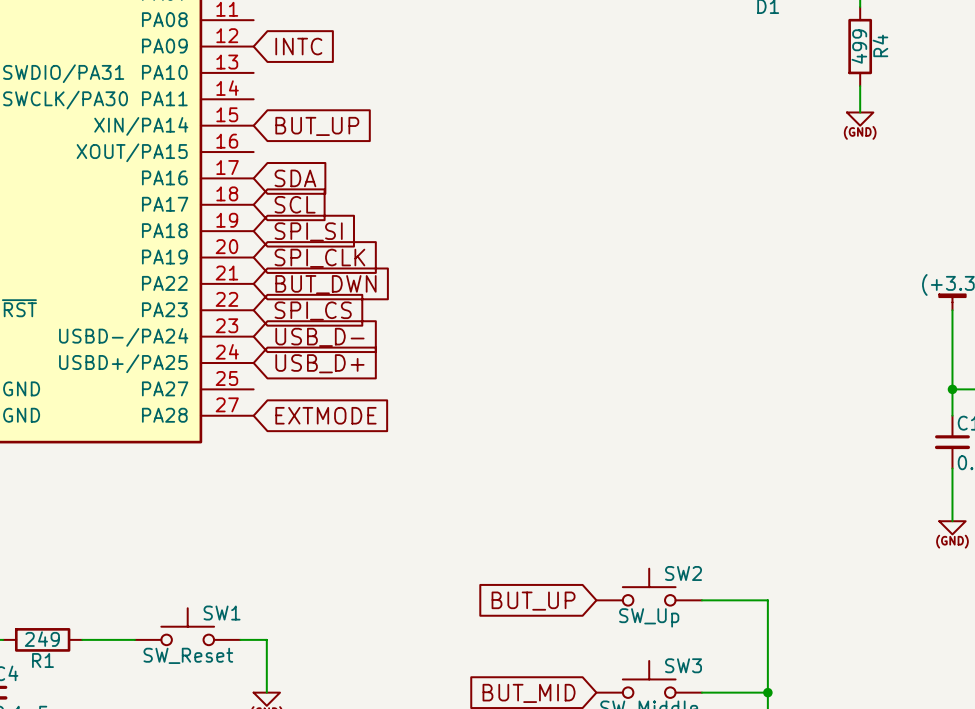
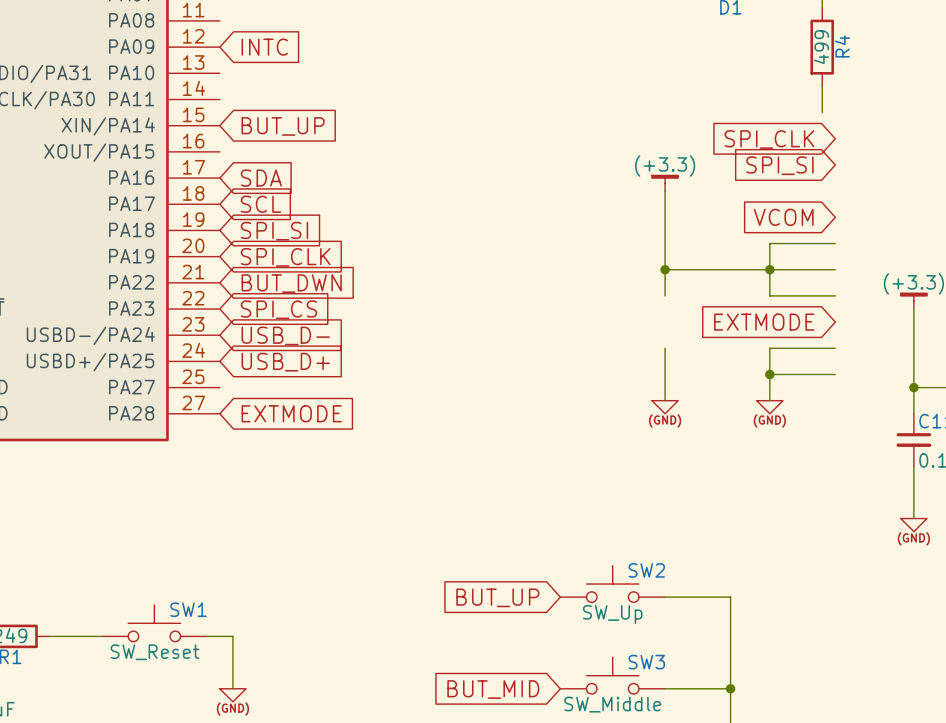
power symbol: (860, 119) -> none
global label: none -> SPI_CLK (769, 139)
global label: none -> SPI_SI (779, 165)
power symbol: none -> (+3.3) (665, 183)
wire: none -> (665, 191) (665, 295)
global label: none -> VCOM (783, 217)
wire: none -> (835, 243) (769, 243) (769, 295) (835, 295)
wire: none -> (665, 269) (835, 269)
junction: none -> (665, 269)
junction: none -> (769, 269)
global label: none -> EXTMODE (764, 322)
wire: none -> (665, 348) (665, 400)
wire: none -> (835, 348) (769, 348) (769, 400)
wire: none -> (769, 374) (835, 374)
junction: none -> (769, 374)
power symbol: none -> (665, 407)
power symbol: none -> (769, 407)

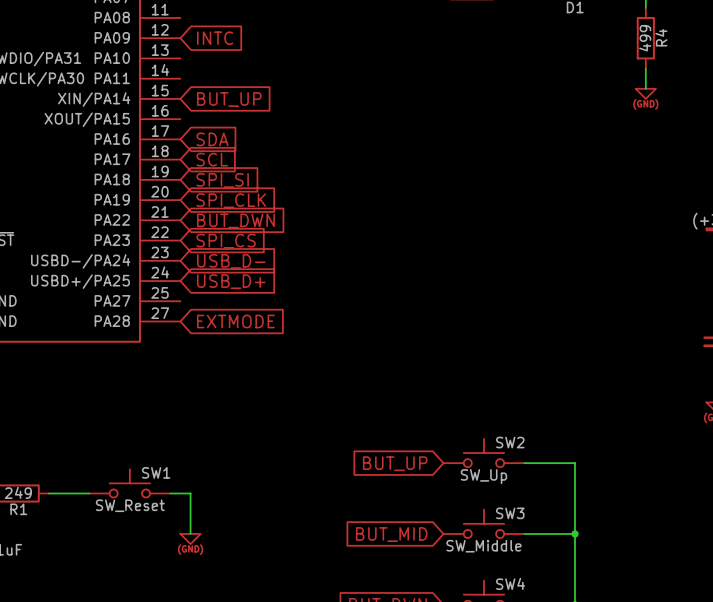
power symbol: none -> (645, 93)
global label: SPI_CLK (769, 139) -> none
global label: SPI_SI (779, 165) -> none
power symbol: (+3.3) (665, 183) -> none
wire: (665, 191) (665, 295) -> none
global label: VCOM (783, 217) -> none
wire: (835, 243) (769, 243) (769, 295) (835, 295) -> none
wire: (665, 269) (835, 269) -> none
junction: (665, 269) -> none
junction: (769, 269) -> none
global label: EXTMODE (764, 322) -> none
wire: (665, 348) (665, 400) -> none
wire: (835, 348) (769, 348) (769, 400) -> none
wire: (769, 374) (835, 374) -> none
junction: (769, 374) -> none
power symbol: (665, 407) -> none
power symbol: (769, 407) -> none

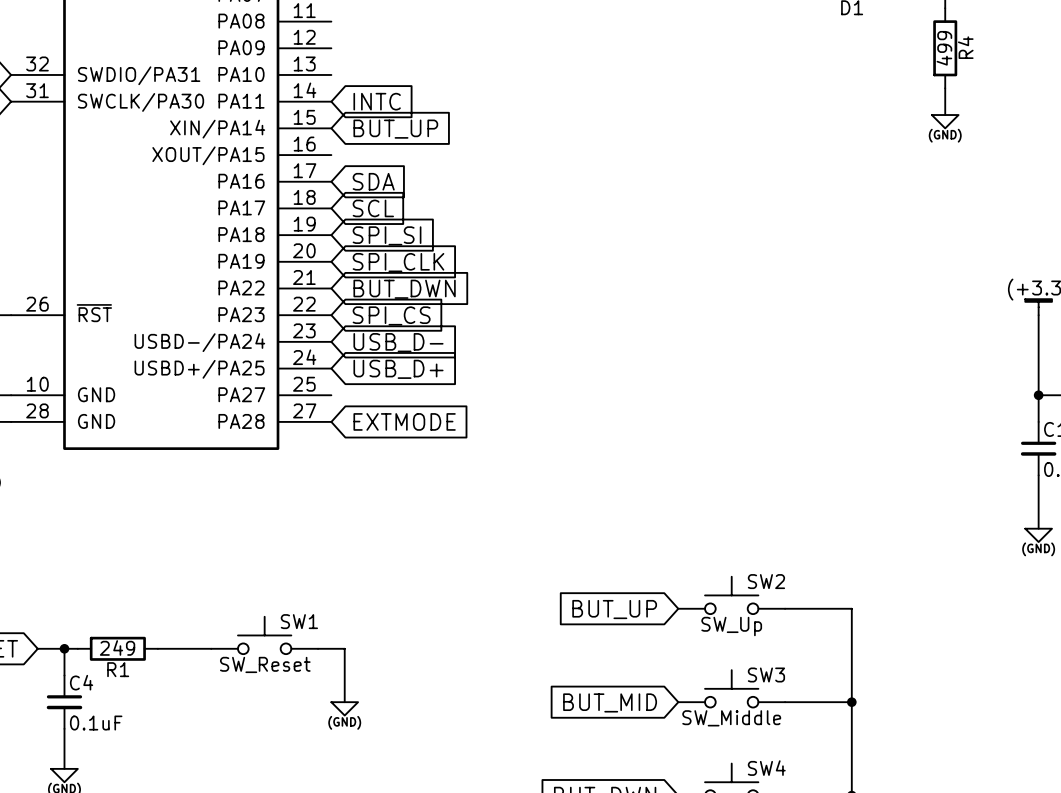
global label position: INTC (215, 38) -> INTC (377, 101)

